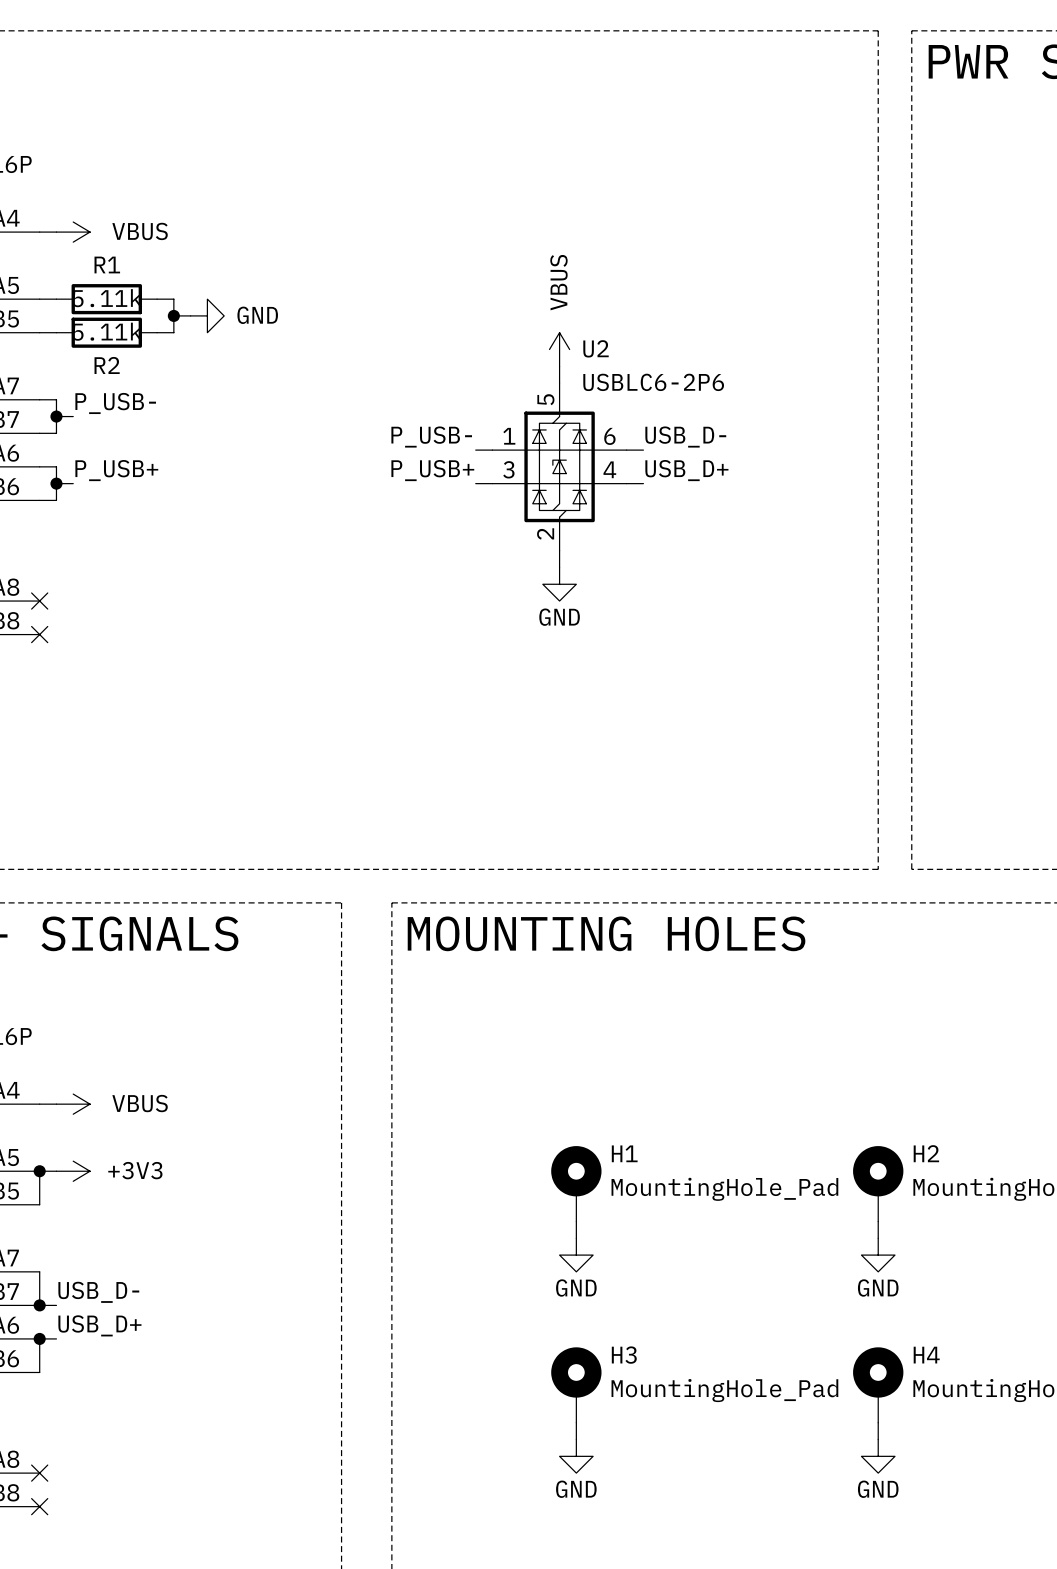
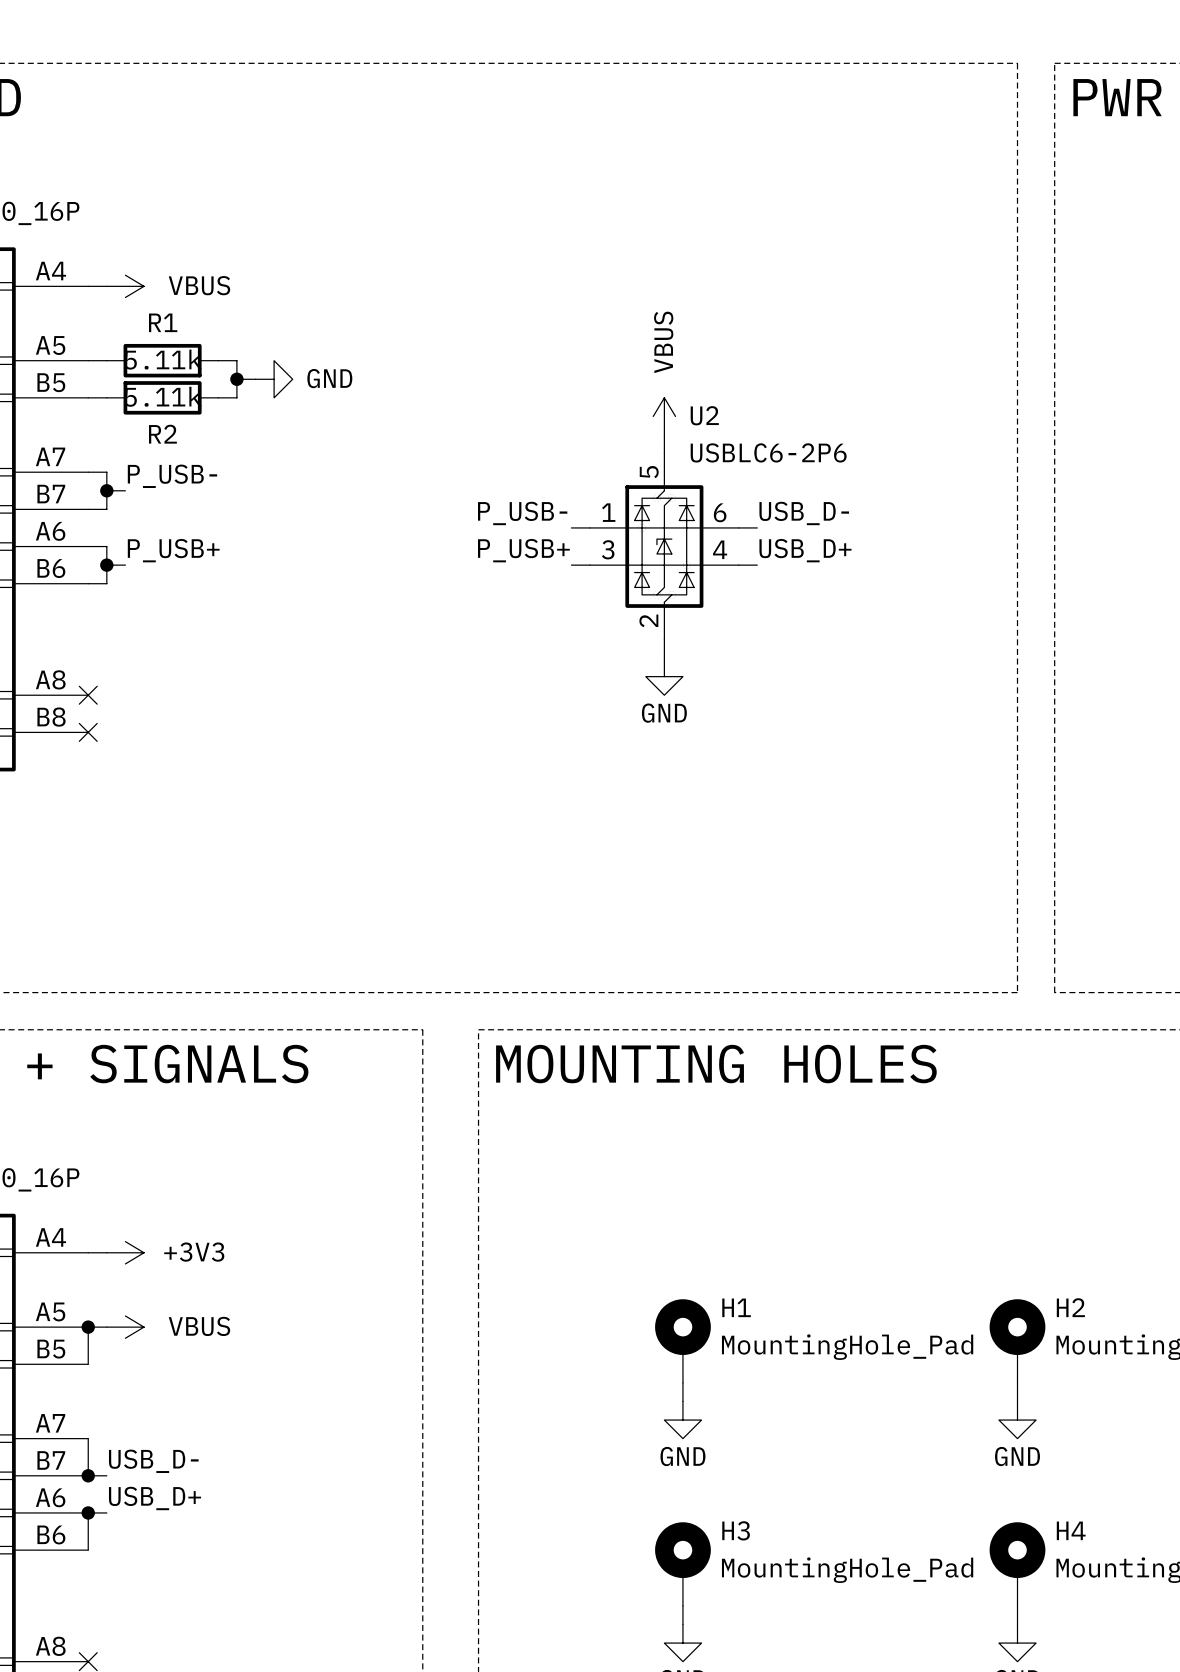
power symbol: VBUS (73, 1104) -> +3V3 (125, 1252)
power symbol: +3V3 (73, 1171) -> VBUS (125, 1327)

